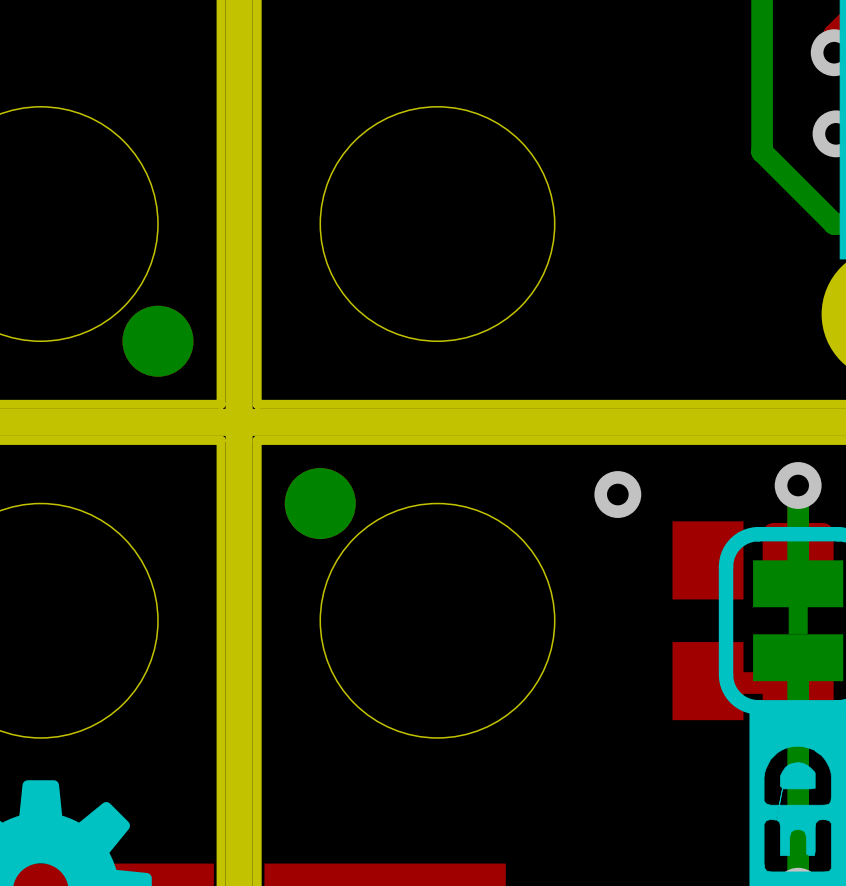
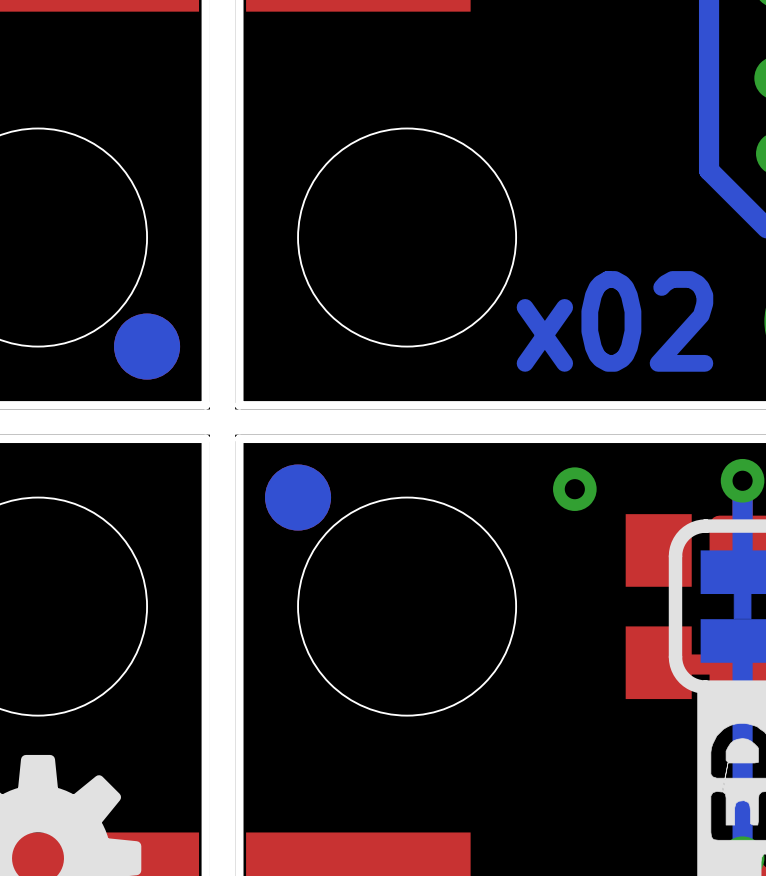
text: none -> x02 (614, 321)

